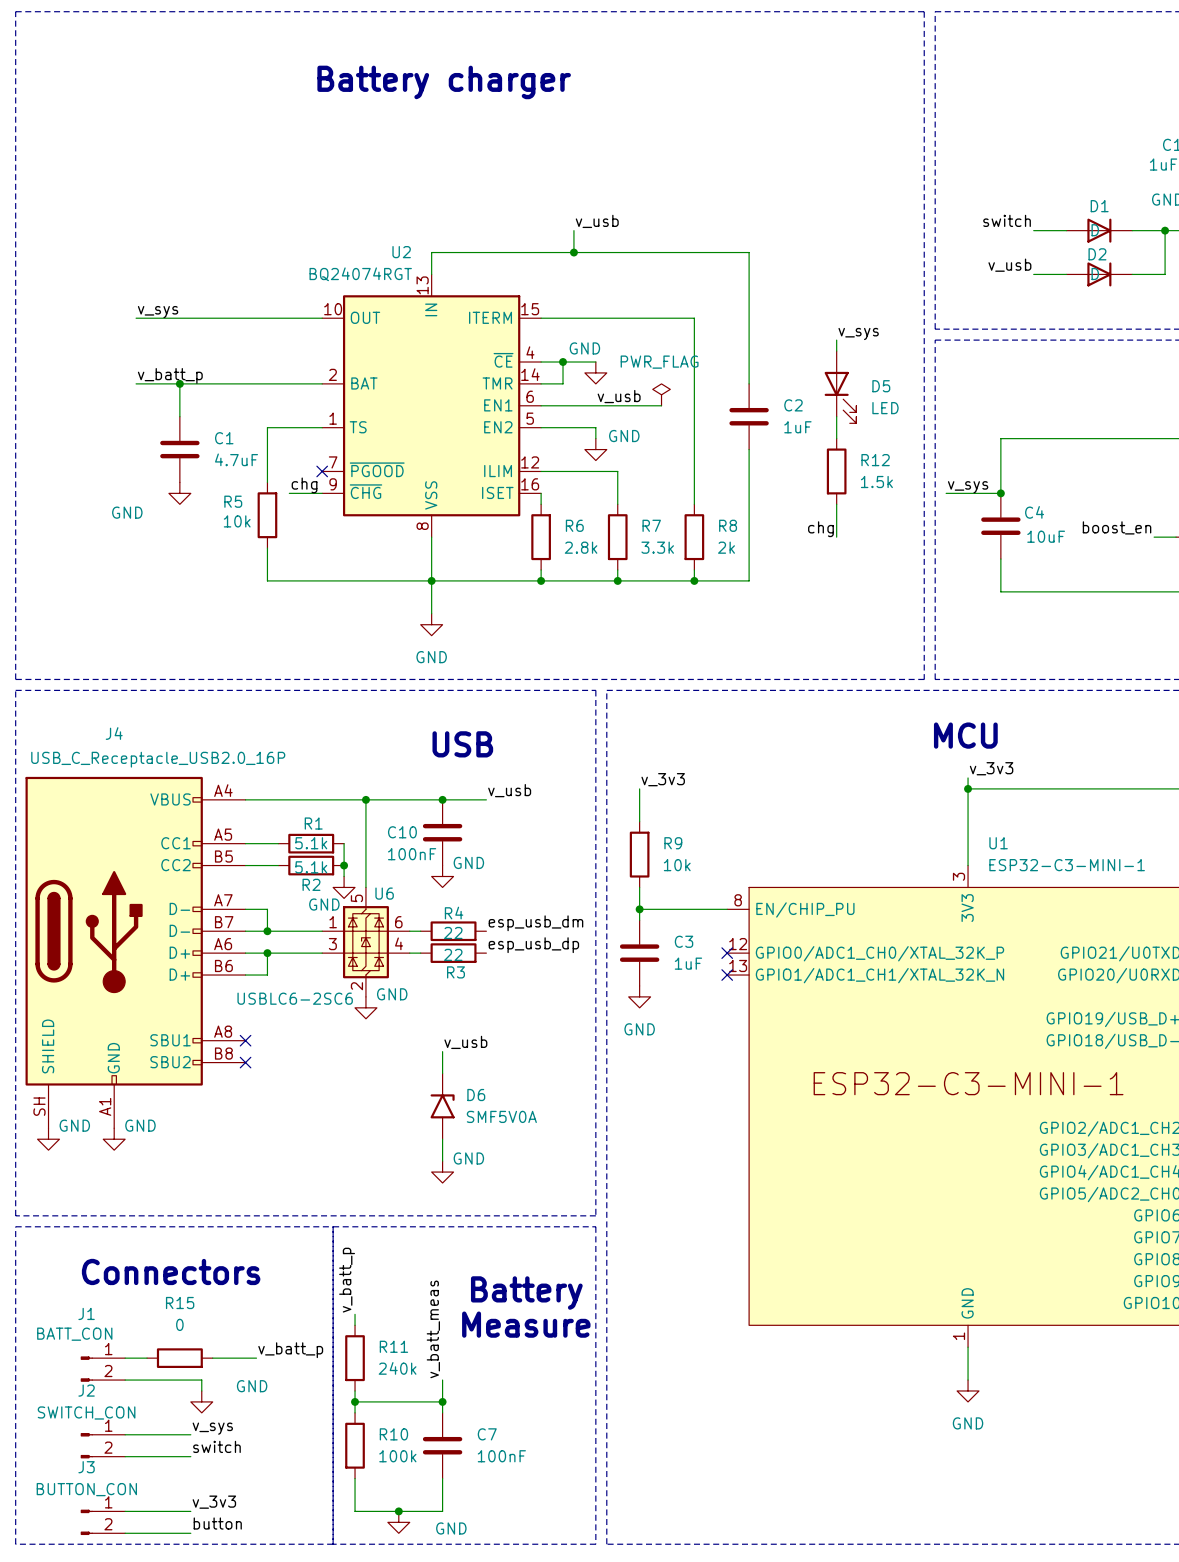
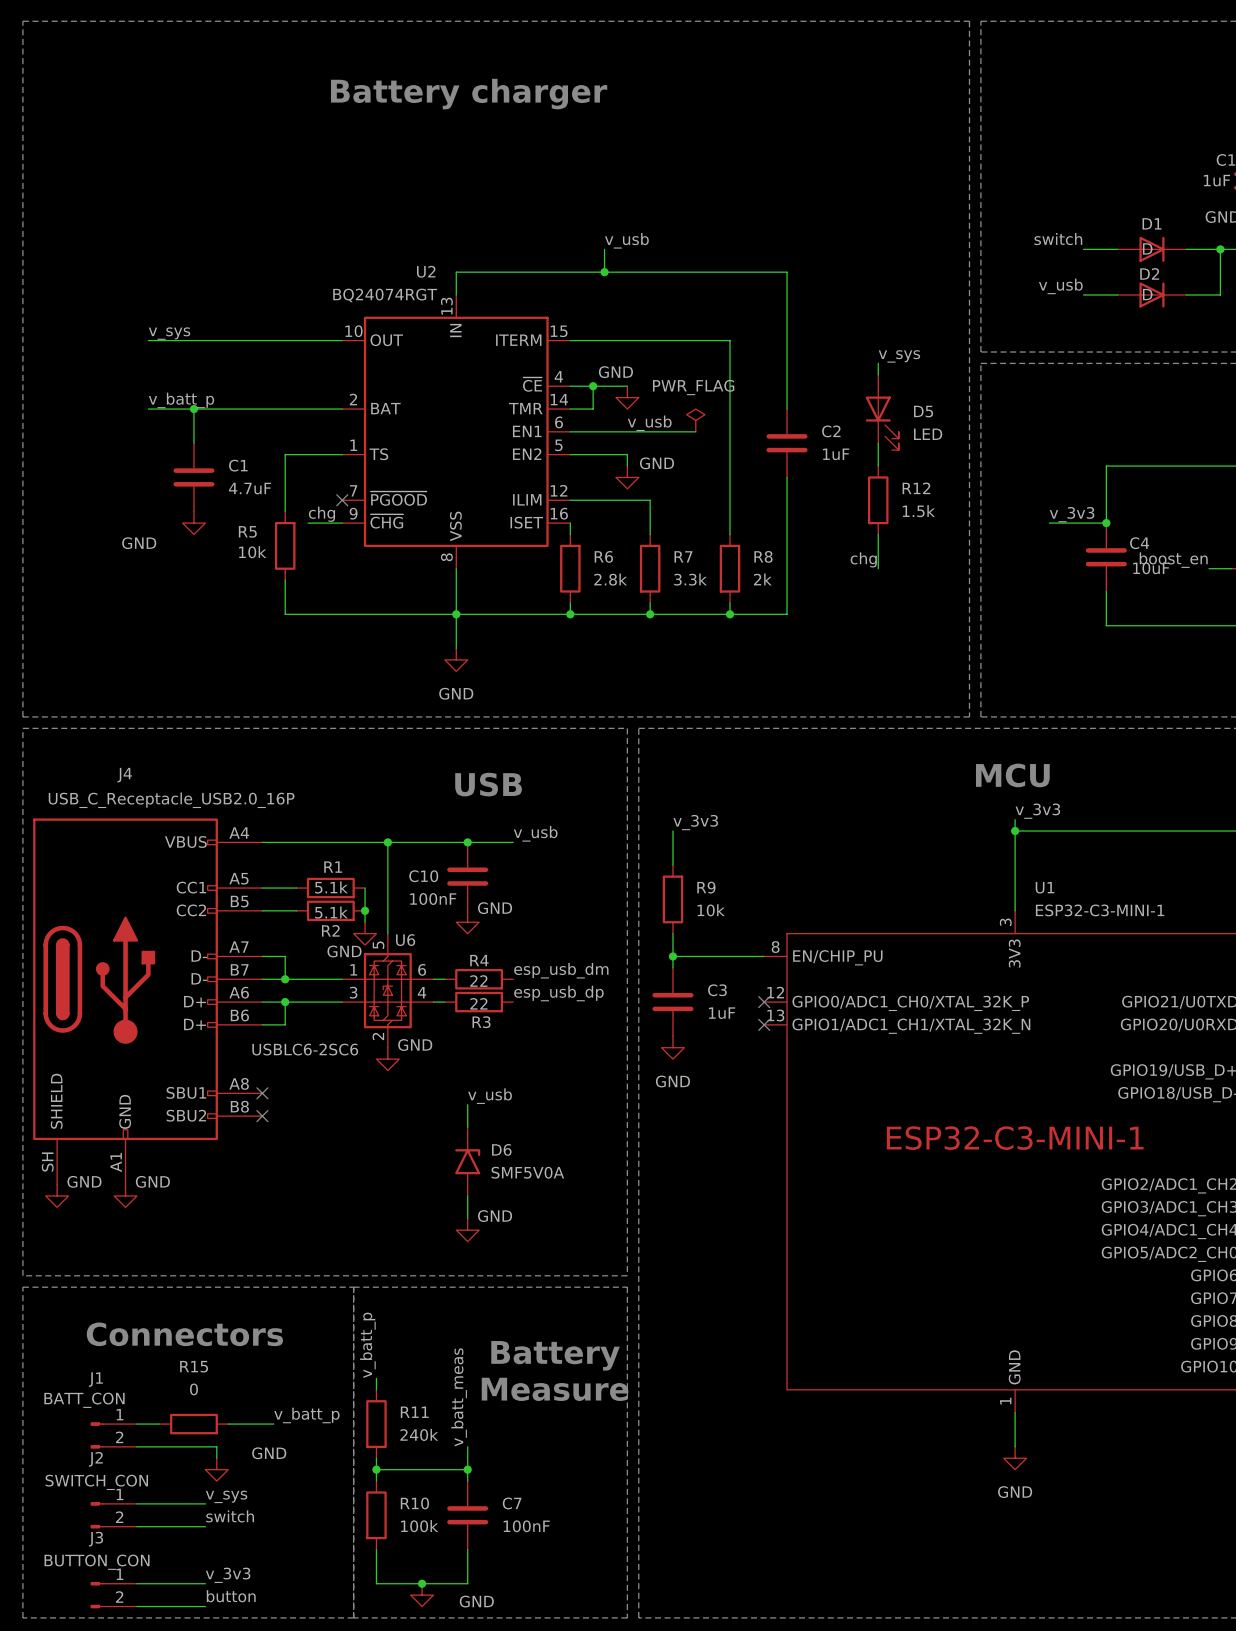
wire: (1055, 438) (1000, 438) (1000, 493) (946, 493) -> (1106, 466) (1106, 523) (1049, 523)
label: none -> v_3v3 (1072, 514)
label: v_sys (968, 487) -> none
junction: (1000, 493) -> none
junction: none -> (1106, 523)
C4 position: (1000, 526) -> (1106, 557)
wire: (1000, 559) (1000, 591) (1055, 591) -> (1106, 591) (1106, 625)

